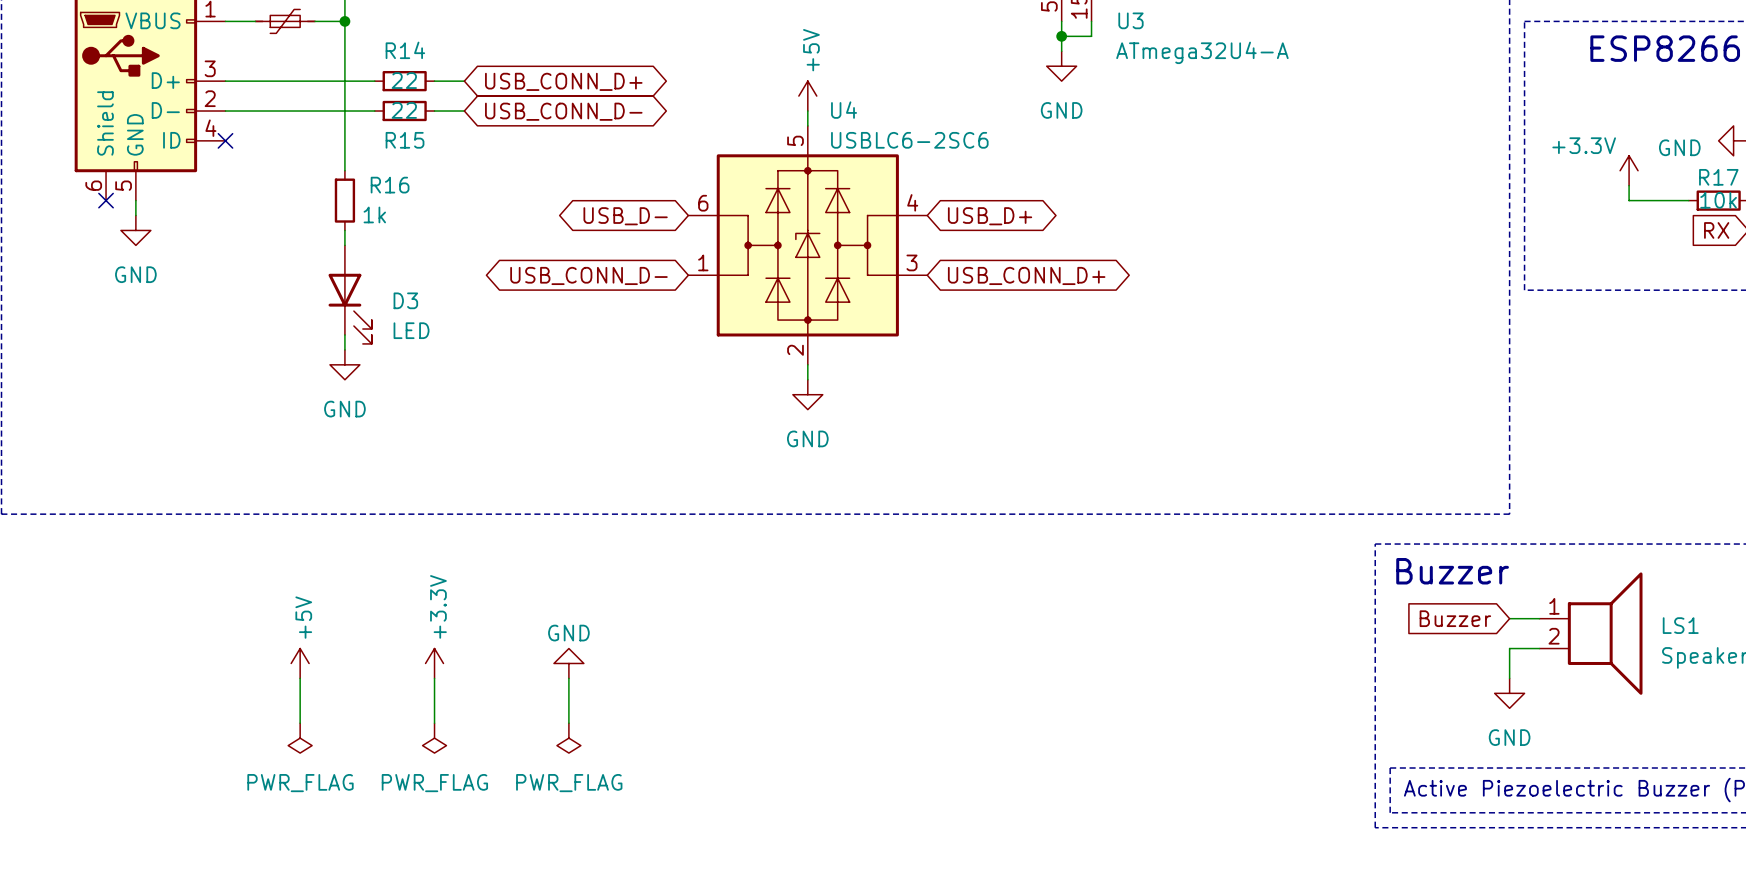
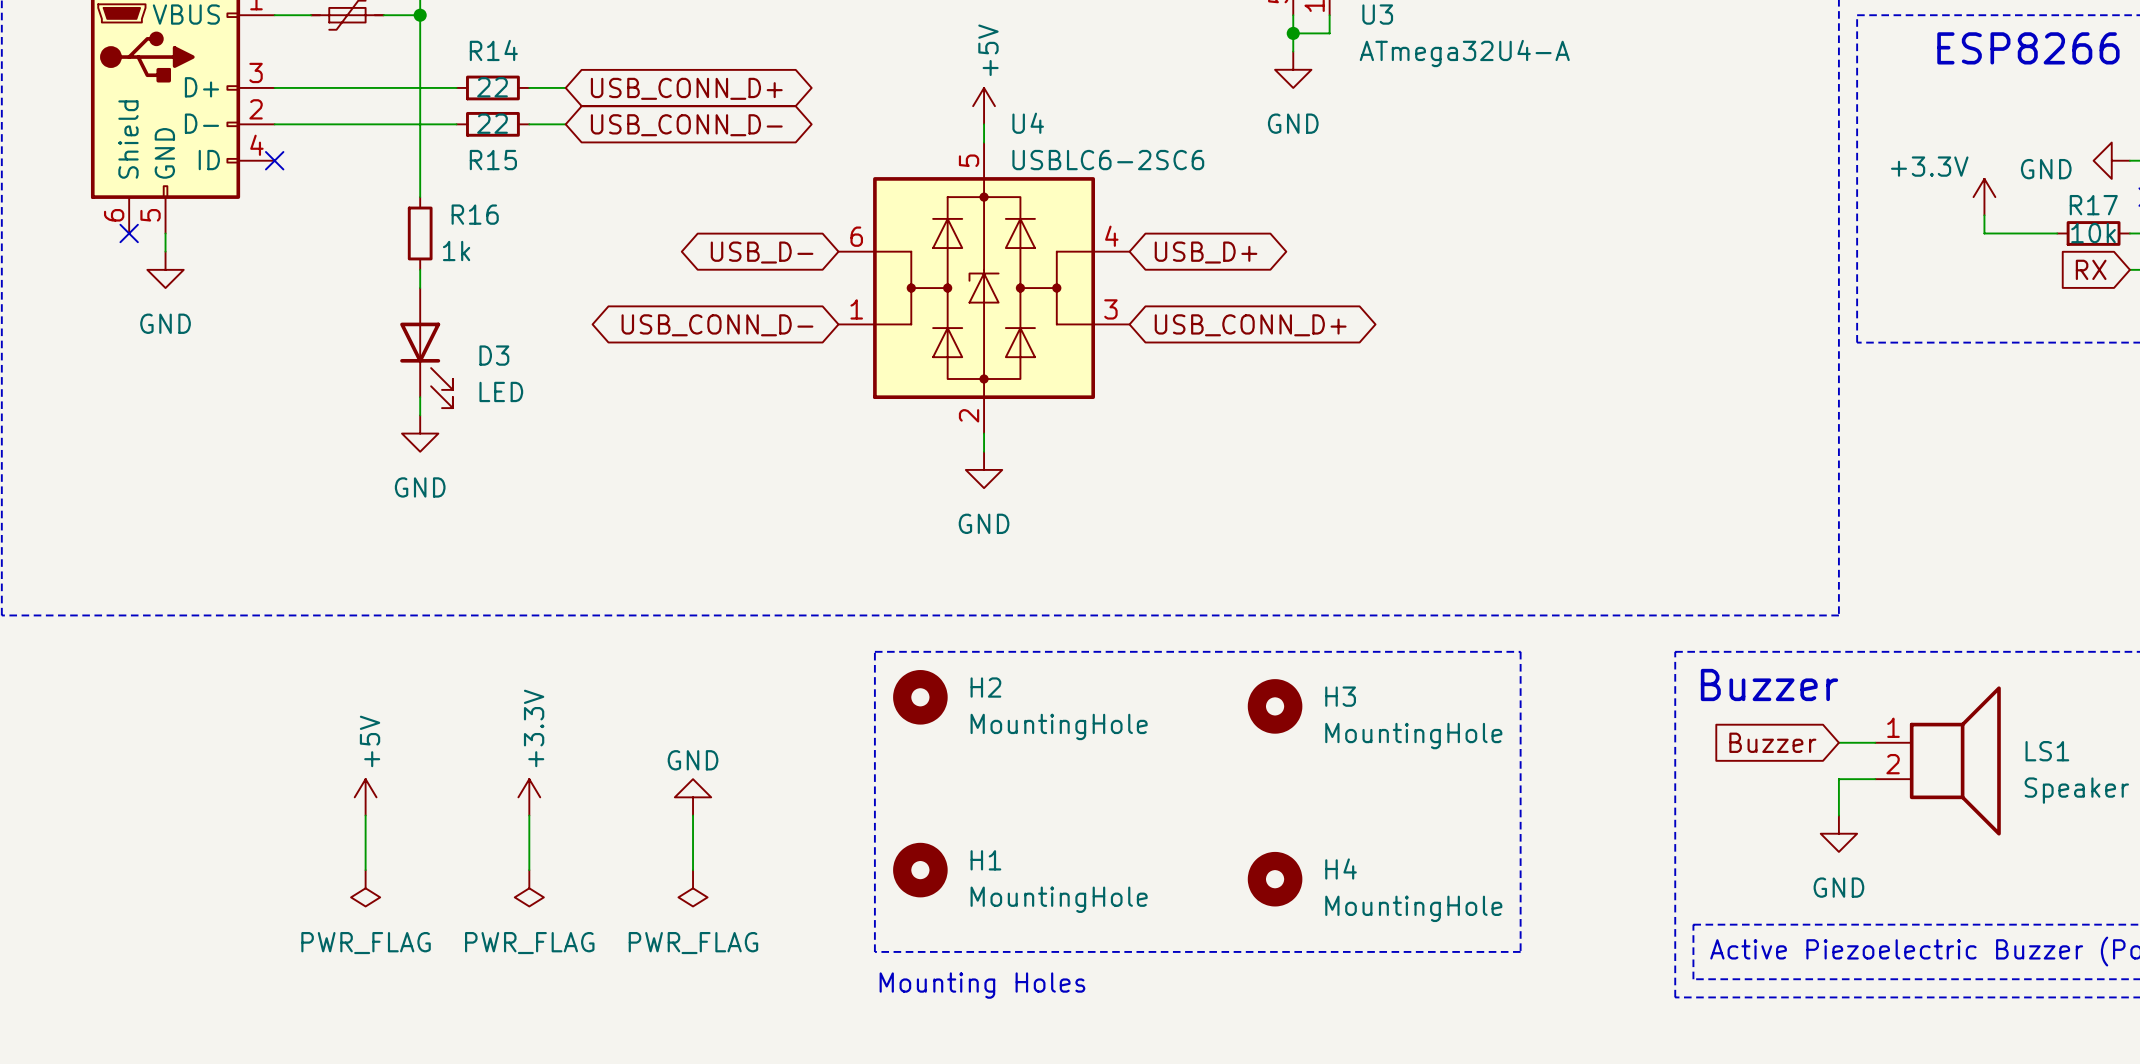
line: none -> (874, 651) (1520, 651) (1520, 951) (874, 951) (874, 651)
H2: none -> MountingHole (920, 697)
H3: none -> MountingHole (1275, 706)
H1: none -> MountingHole (920, 870)
H4: none -> MountingHole (1275, 879)
text: none -> Mounting Holes (982, 985)

